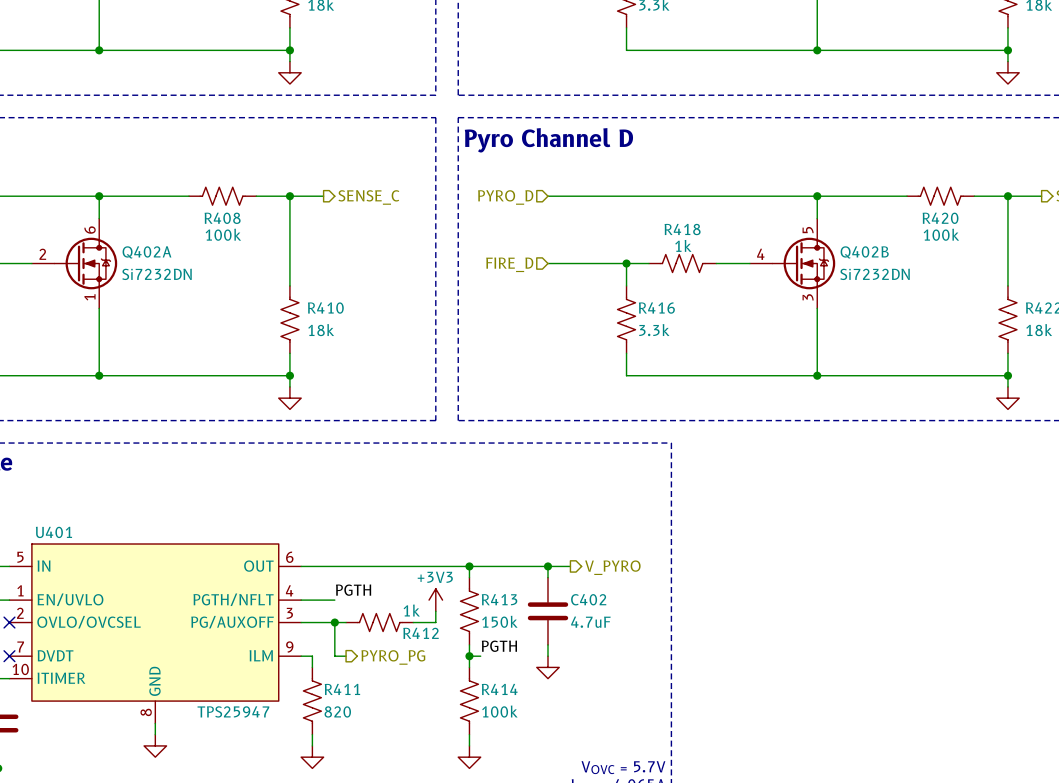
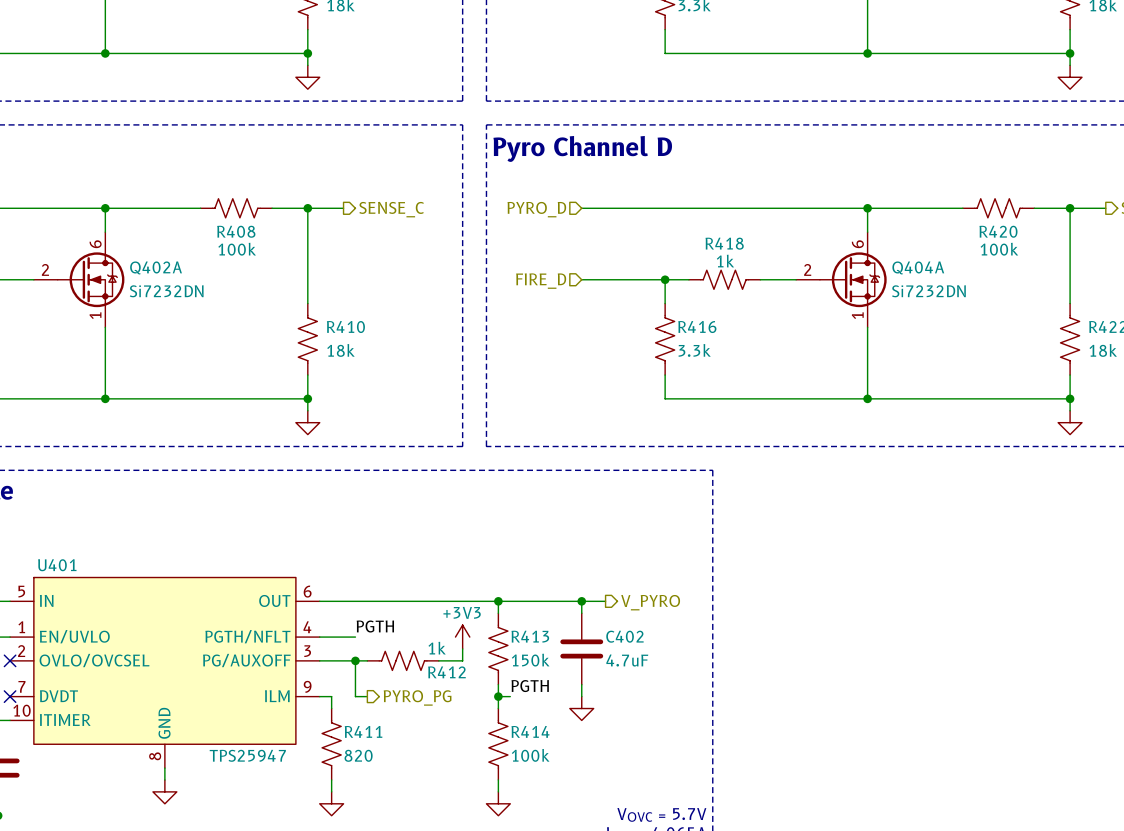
Q402B pin number: 5 (808, 230) -> 6 (857, 244)
Q402B name: Q402B (864, 252) -> Q404A (918, 267)
Q402B pin number: 4 (760, 254) -> 2 (807, 269)
Q402B pin number: 3 (808, 297) -> 1 (857, 315)

